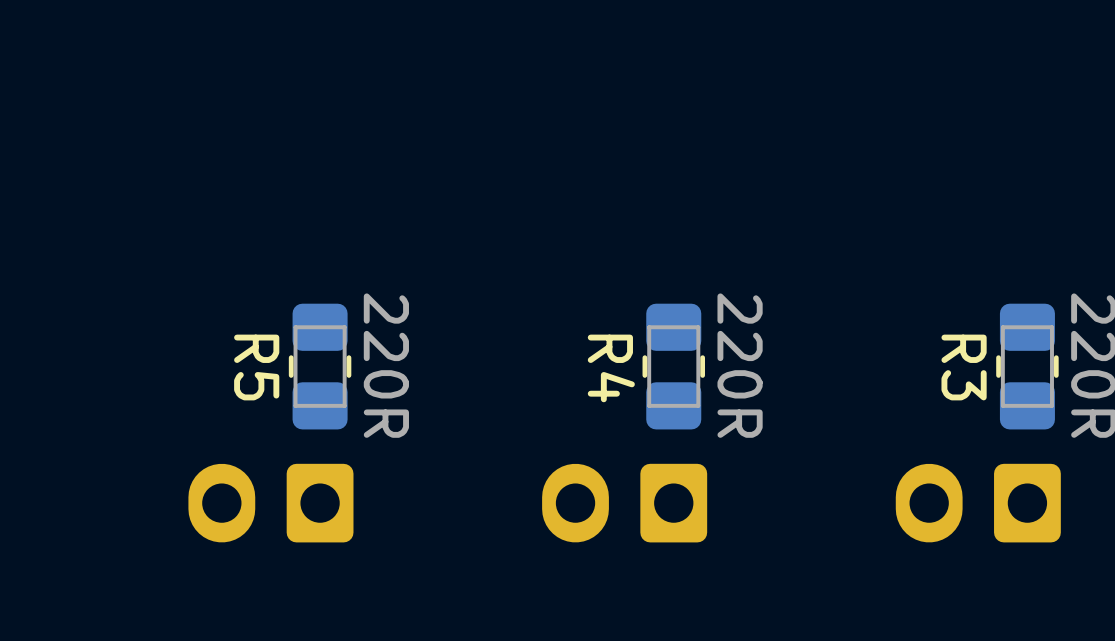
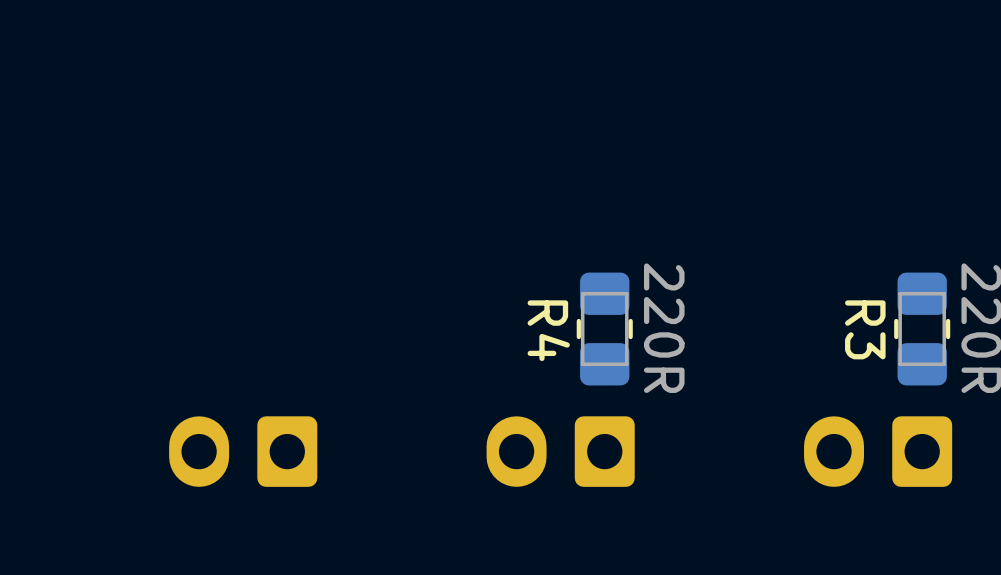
R5: 220R (320, 366) -> none

